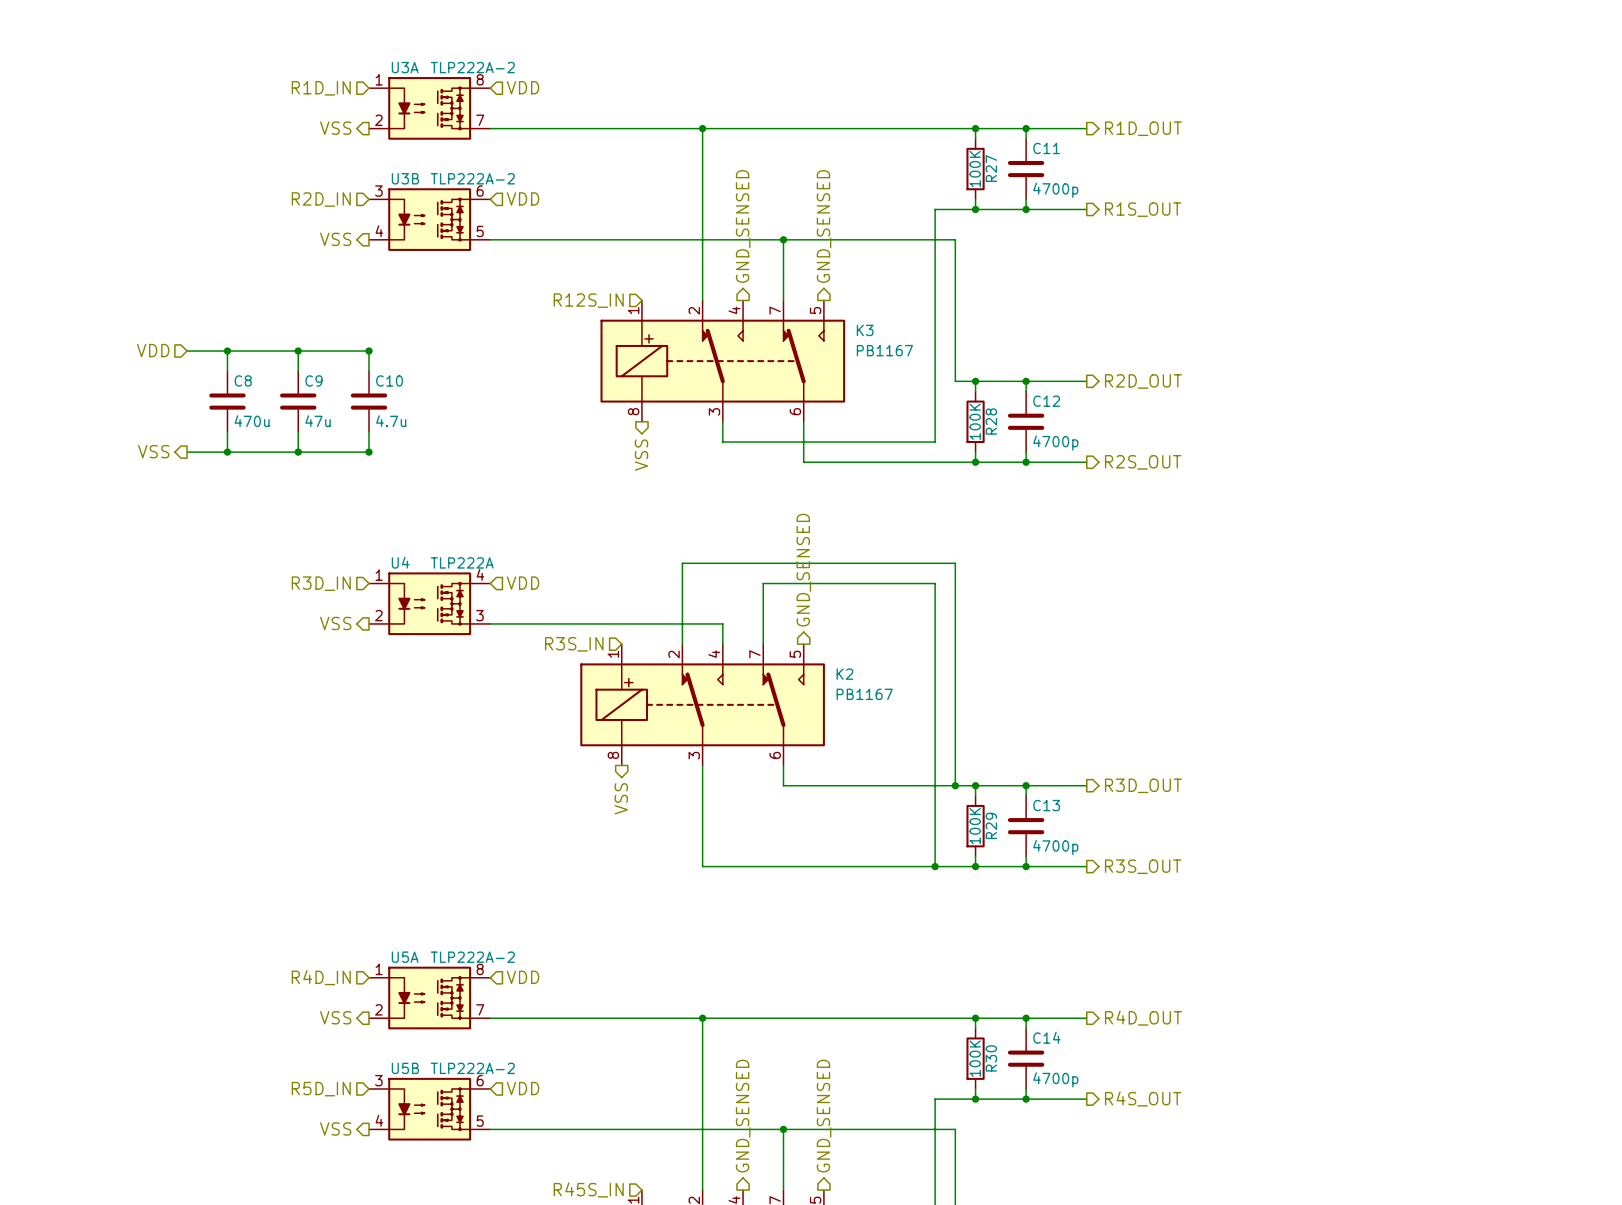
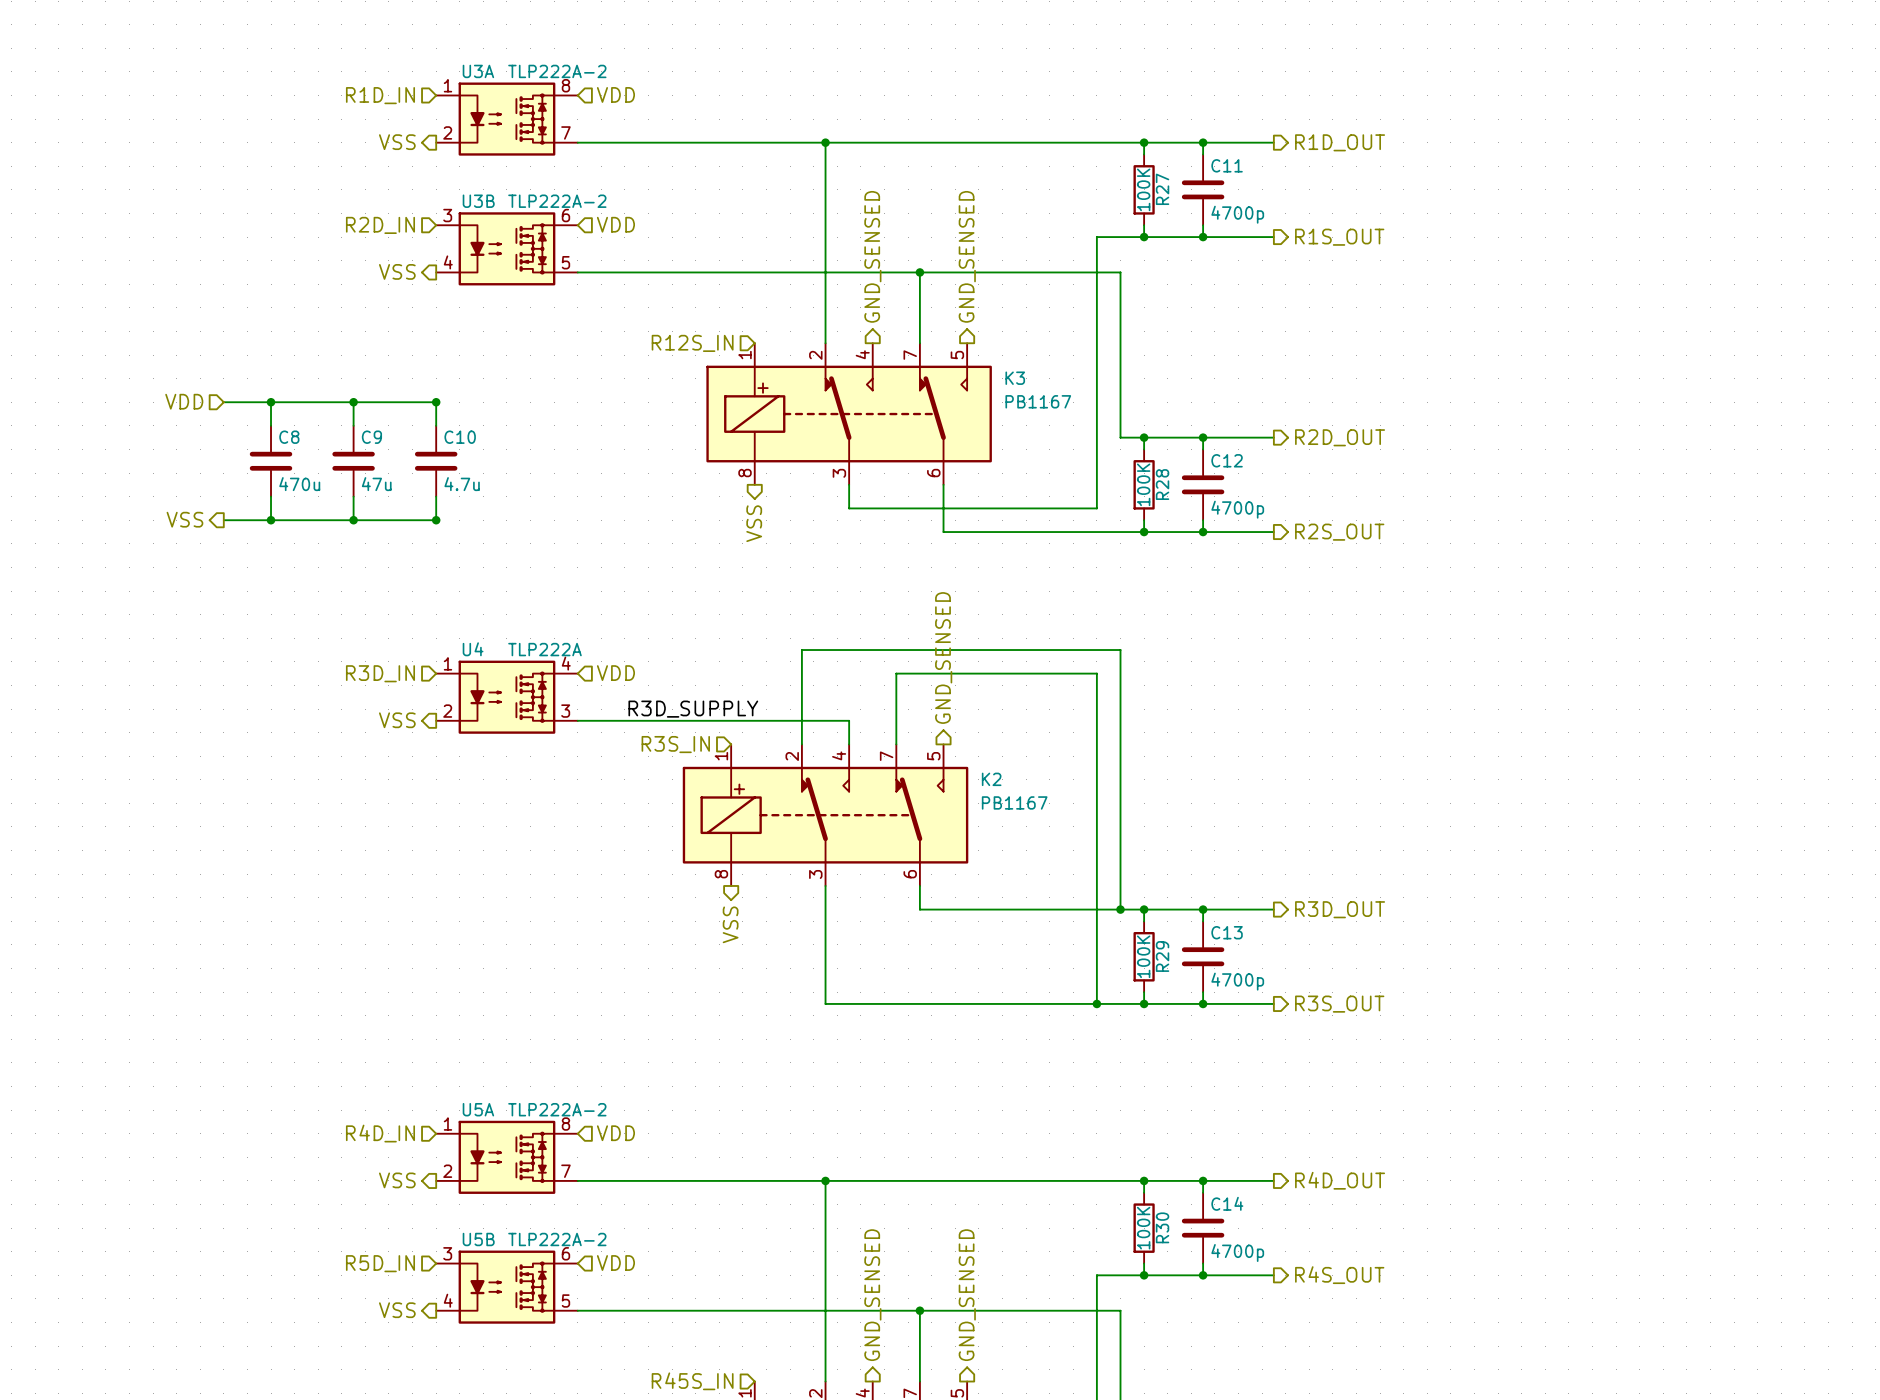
label: none -> R3D_SUPPLY (693, 709)

